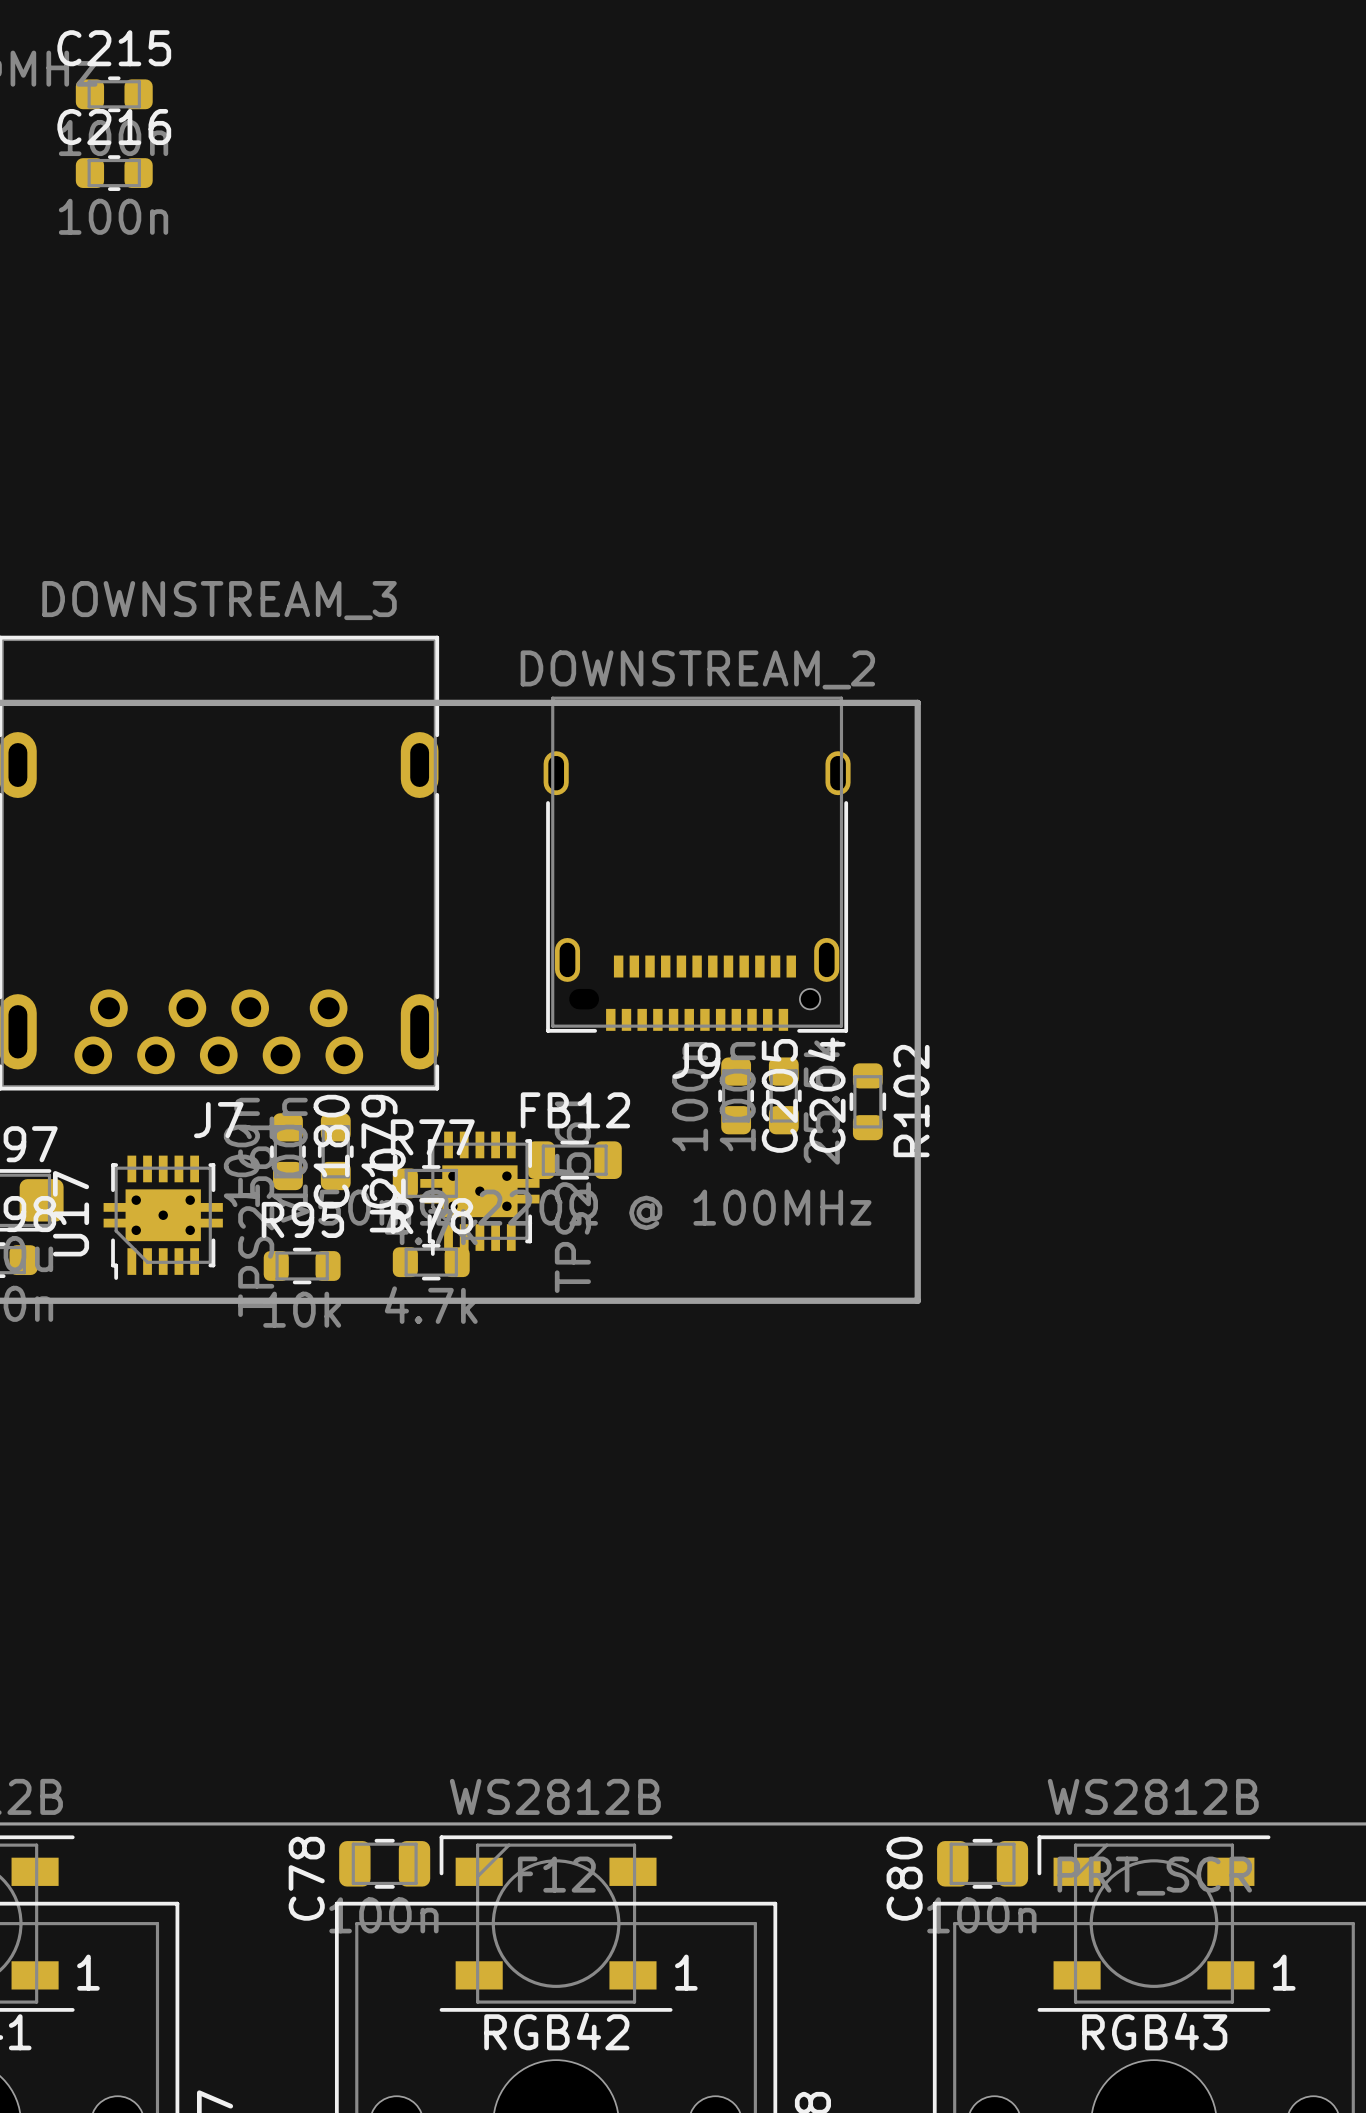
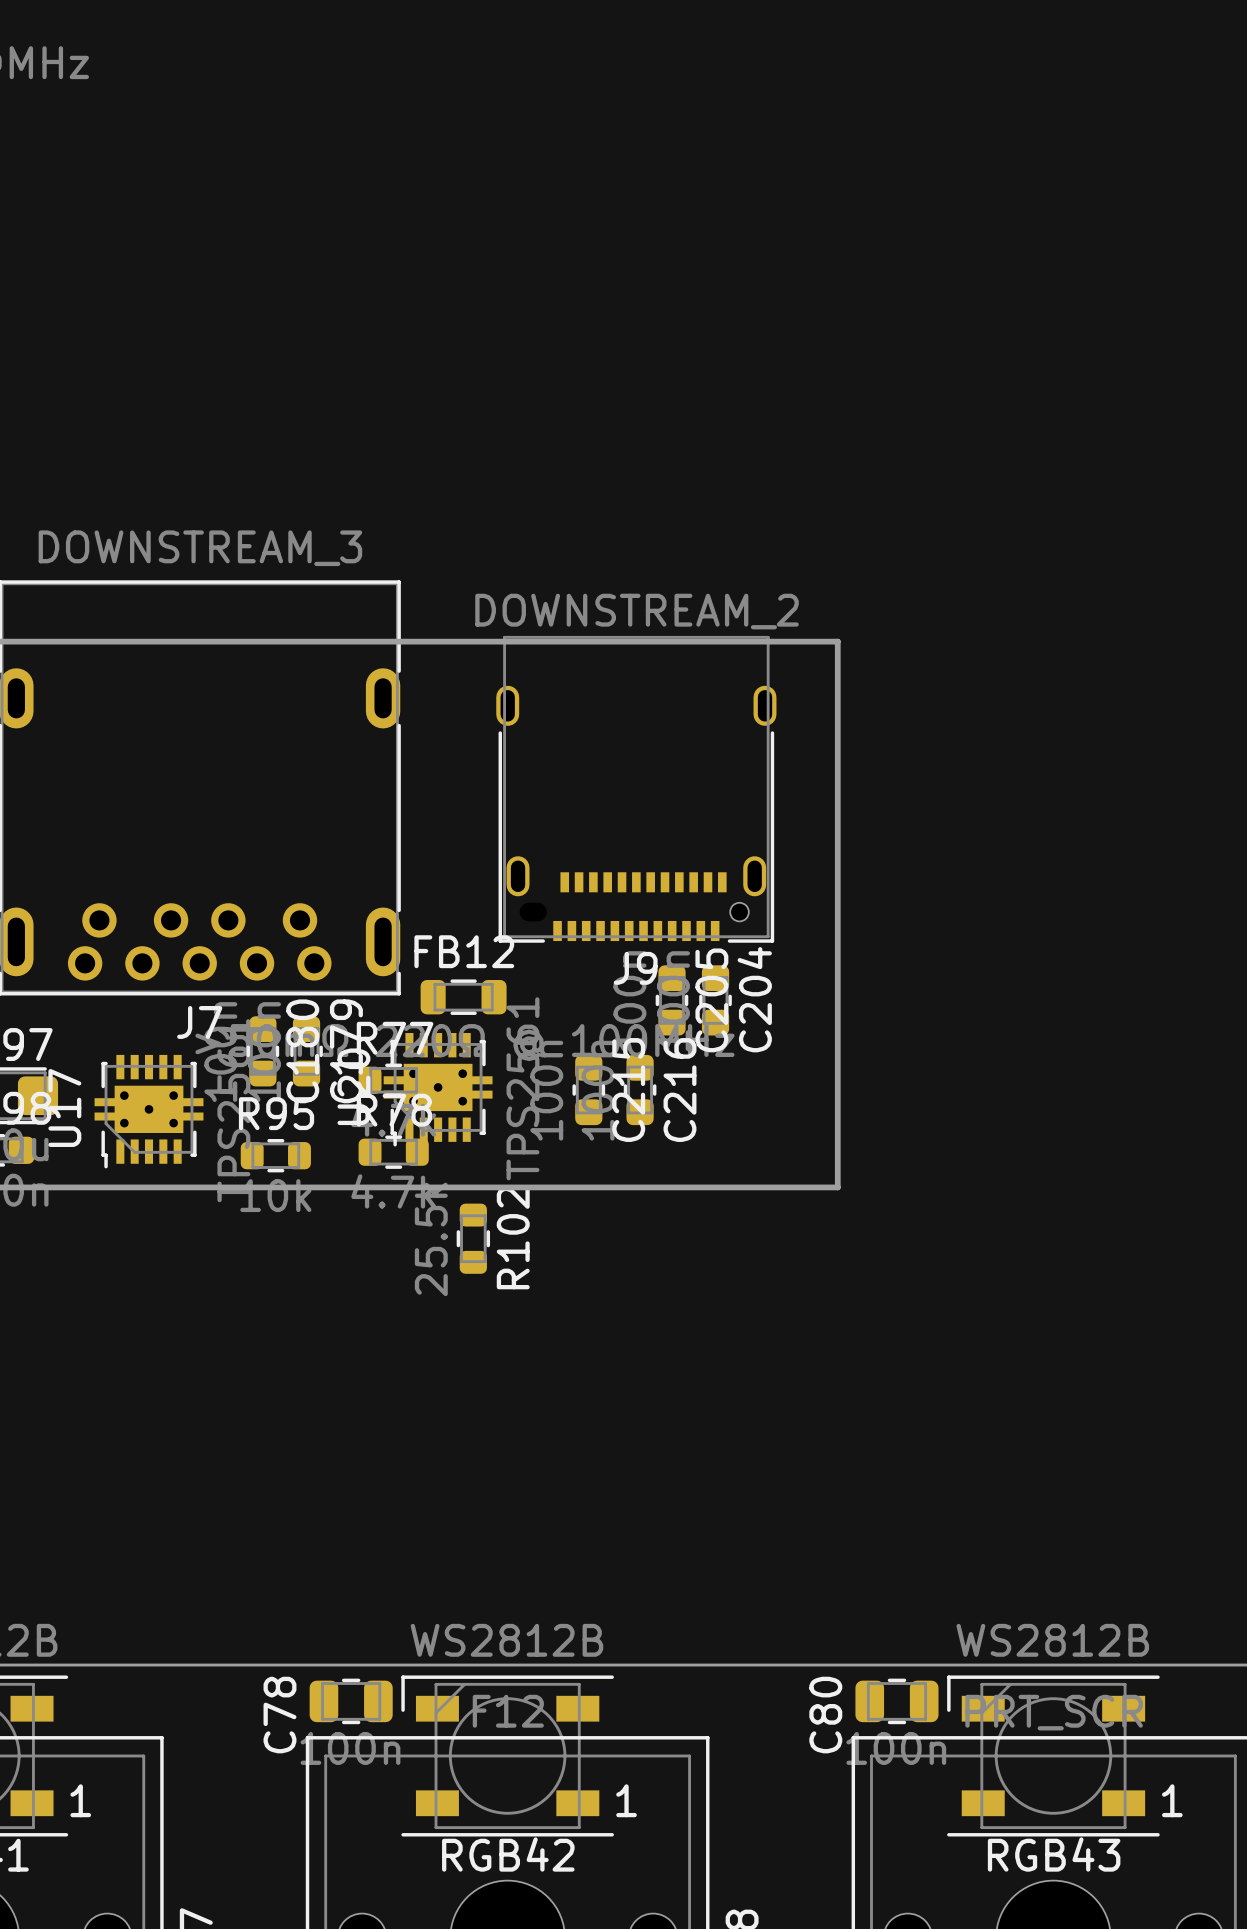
C215 rotation: 0° (114, 94) -> 90° clockwise (588, 1090)
C215 position: (114, 94) -> (588, 1090)
C216 rotation: 0° (114, 173) -> 90° clockwise (640, 1090)
C216 position: (114, 173) -> (640, 1090)
R102 position: (867, 1101) -> (473, 1238)
FB12 position: (574, 1160) -> (463, 997)

